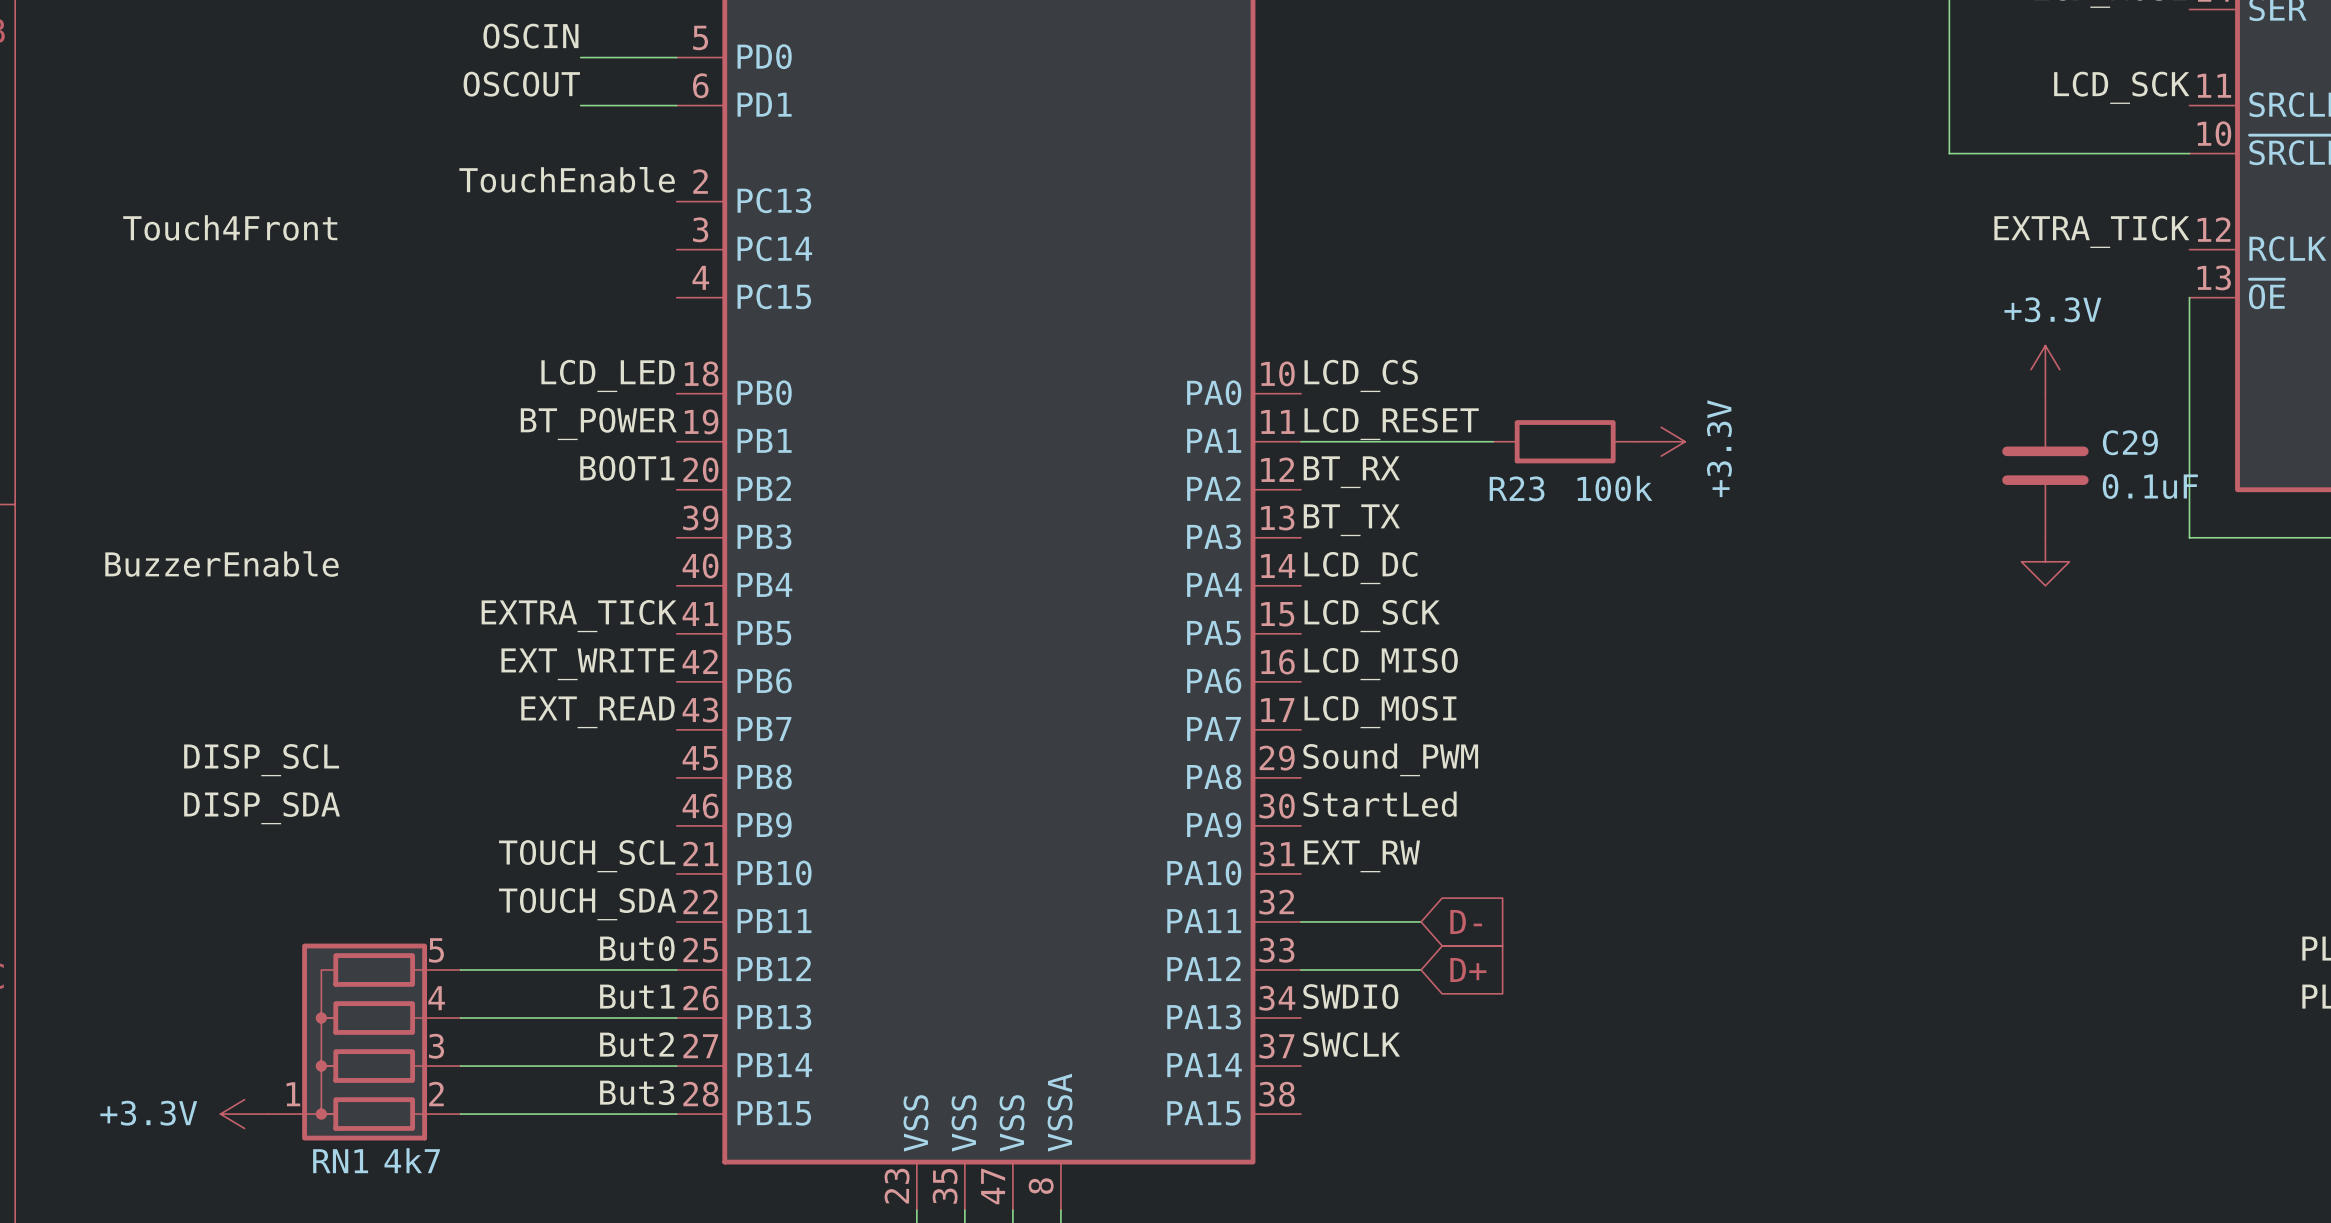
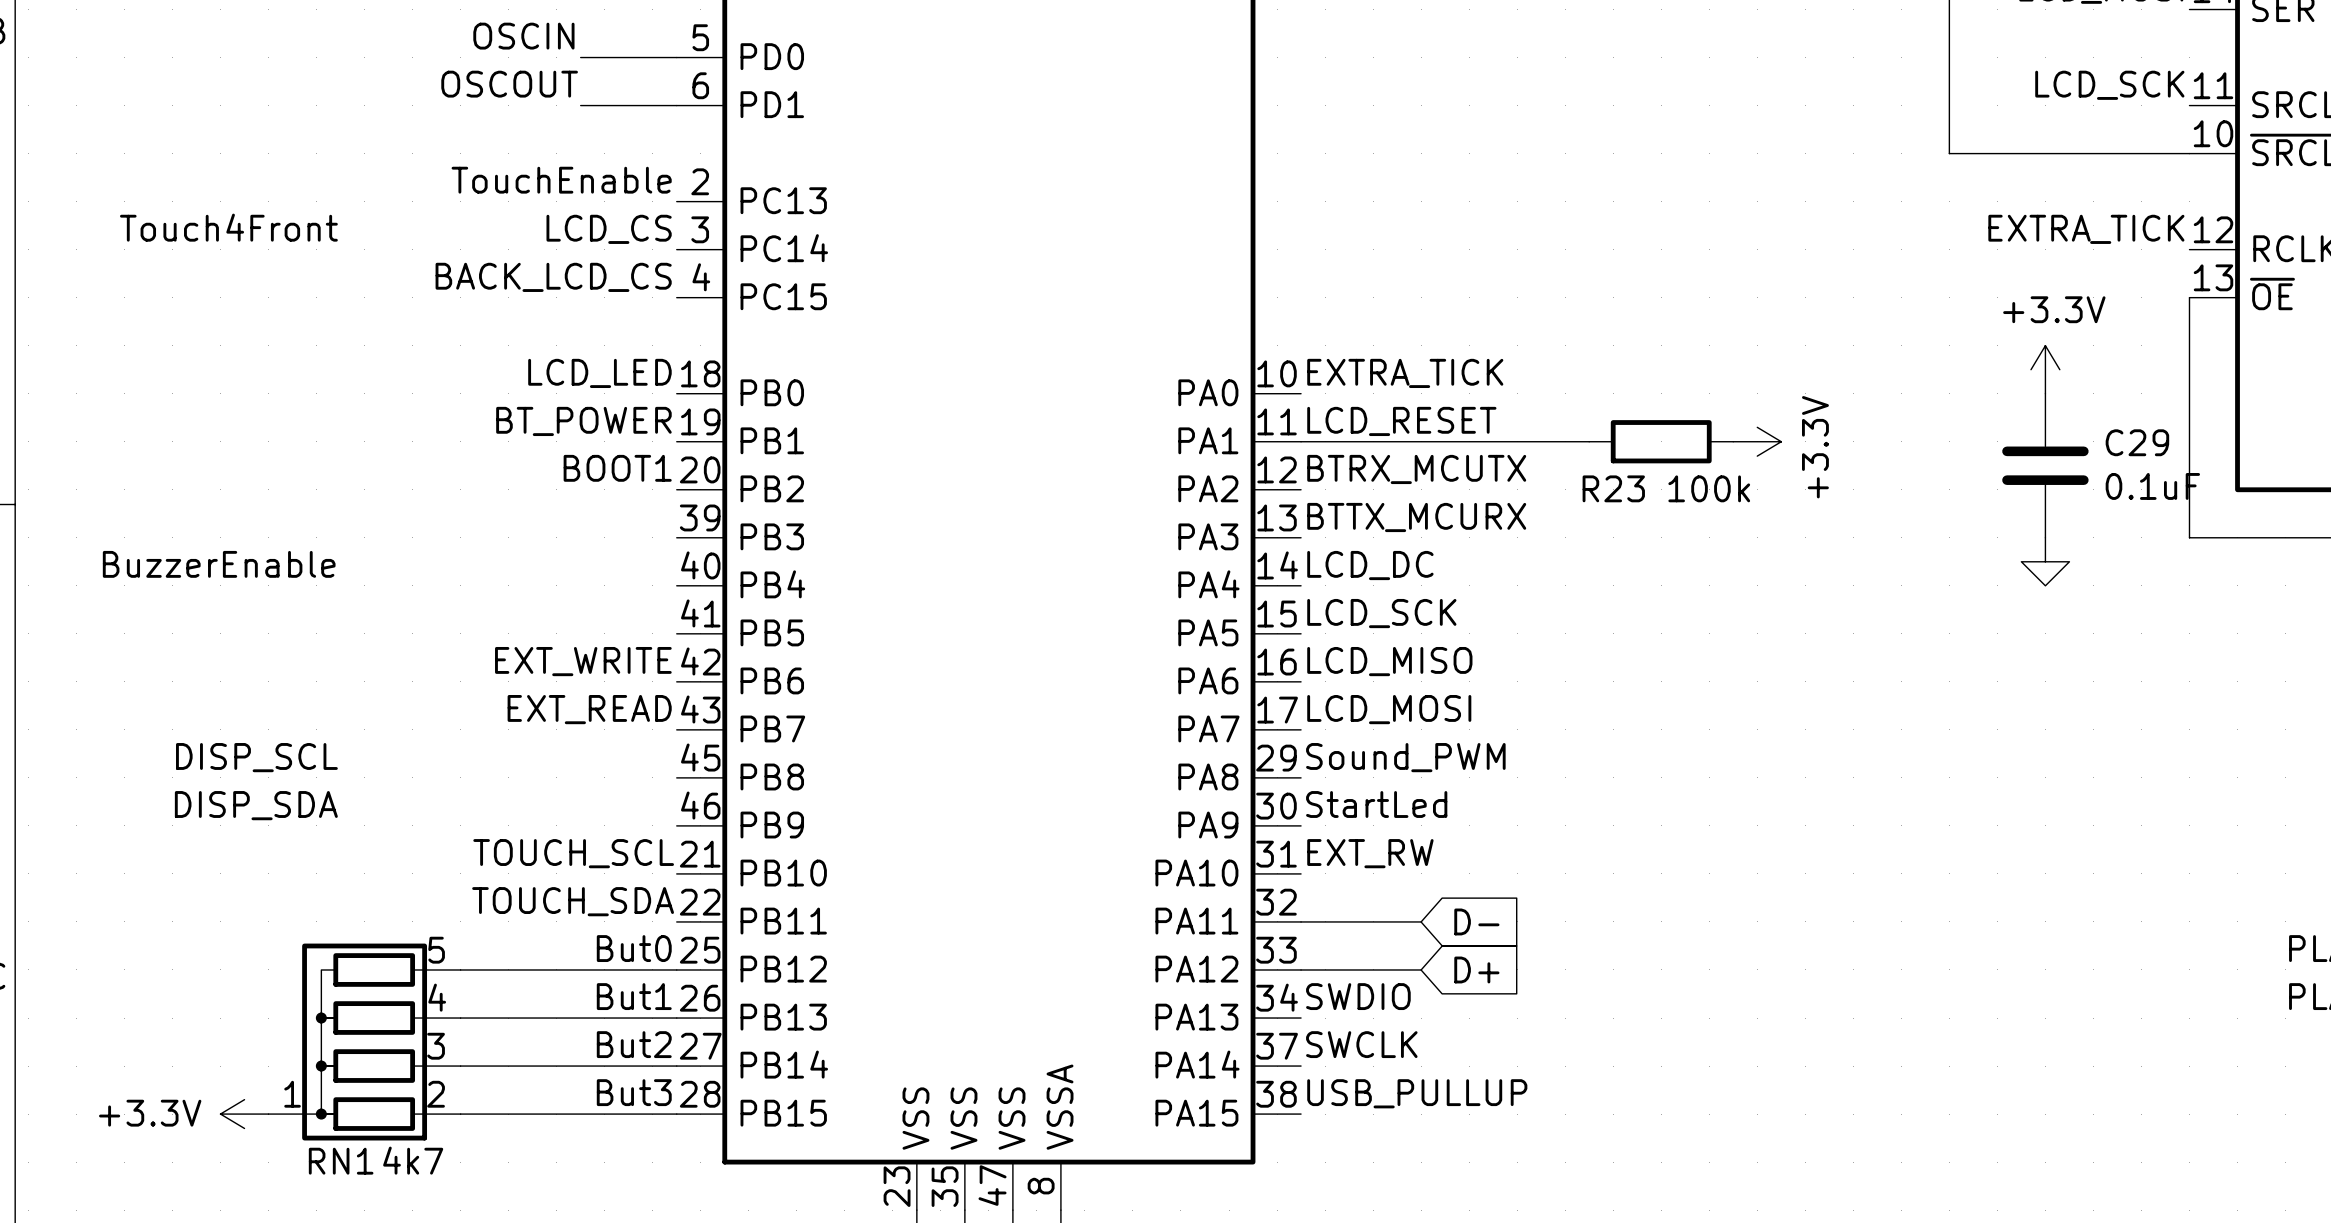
label: none -> LCD_CS (609, 229)
label: none -> BACK_LCD_CS (553, 277)
label: LCD_CS (1361, 375) -> EXTRA_TICK (1405, 373)
wire: none -> (1493, 441) (1589, 441)
R23 position: (1565, 441) -> (1661, 441)
power symbol position: +3.3V (1661, 441) -> +3.3V (1757, 441)
label: BT_RX (1351, 472) -> BTRX_MCUTX (1416, 469)
label: BT_TX (1351, 520) -> BTTX_MCURX (1416, 517)
label: EXTRA_TICK (579, 616) -> none
label: none -> USB_PULLUP (1417, 1093)

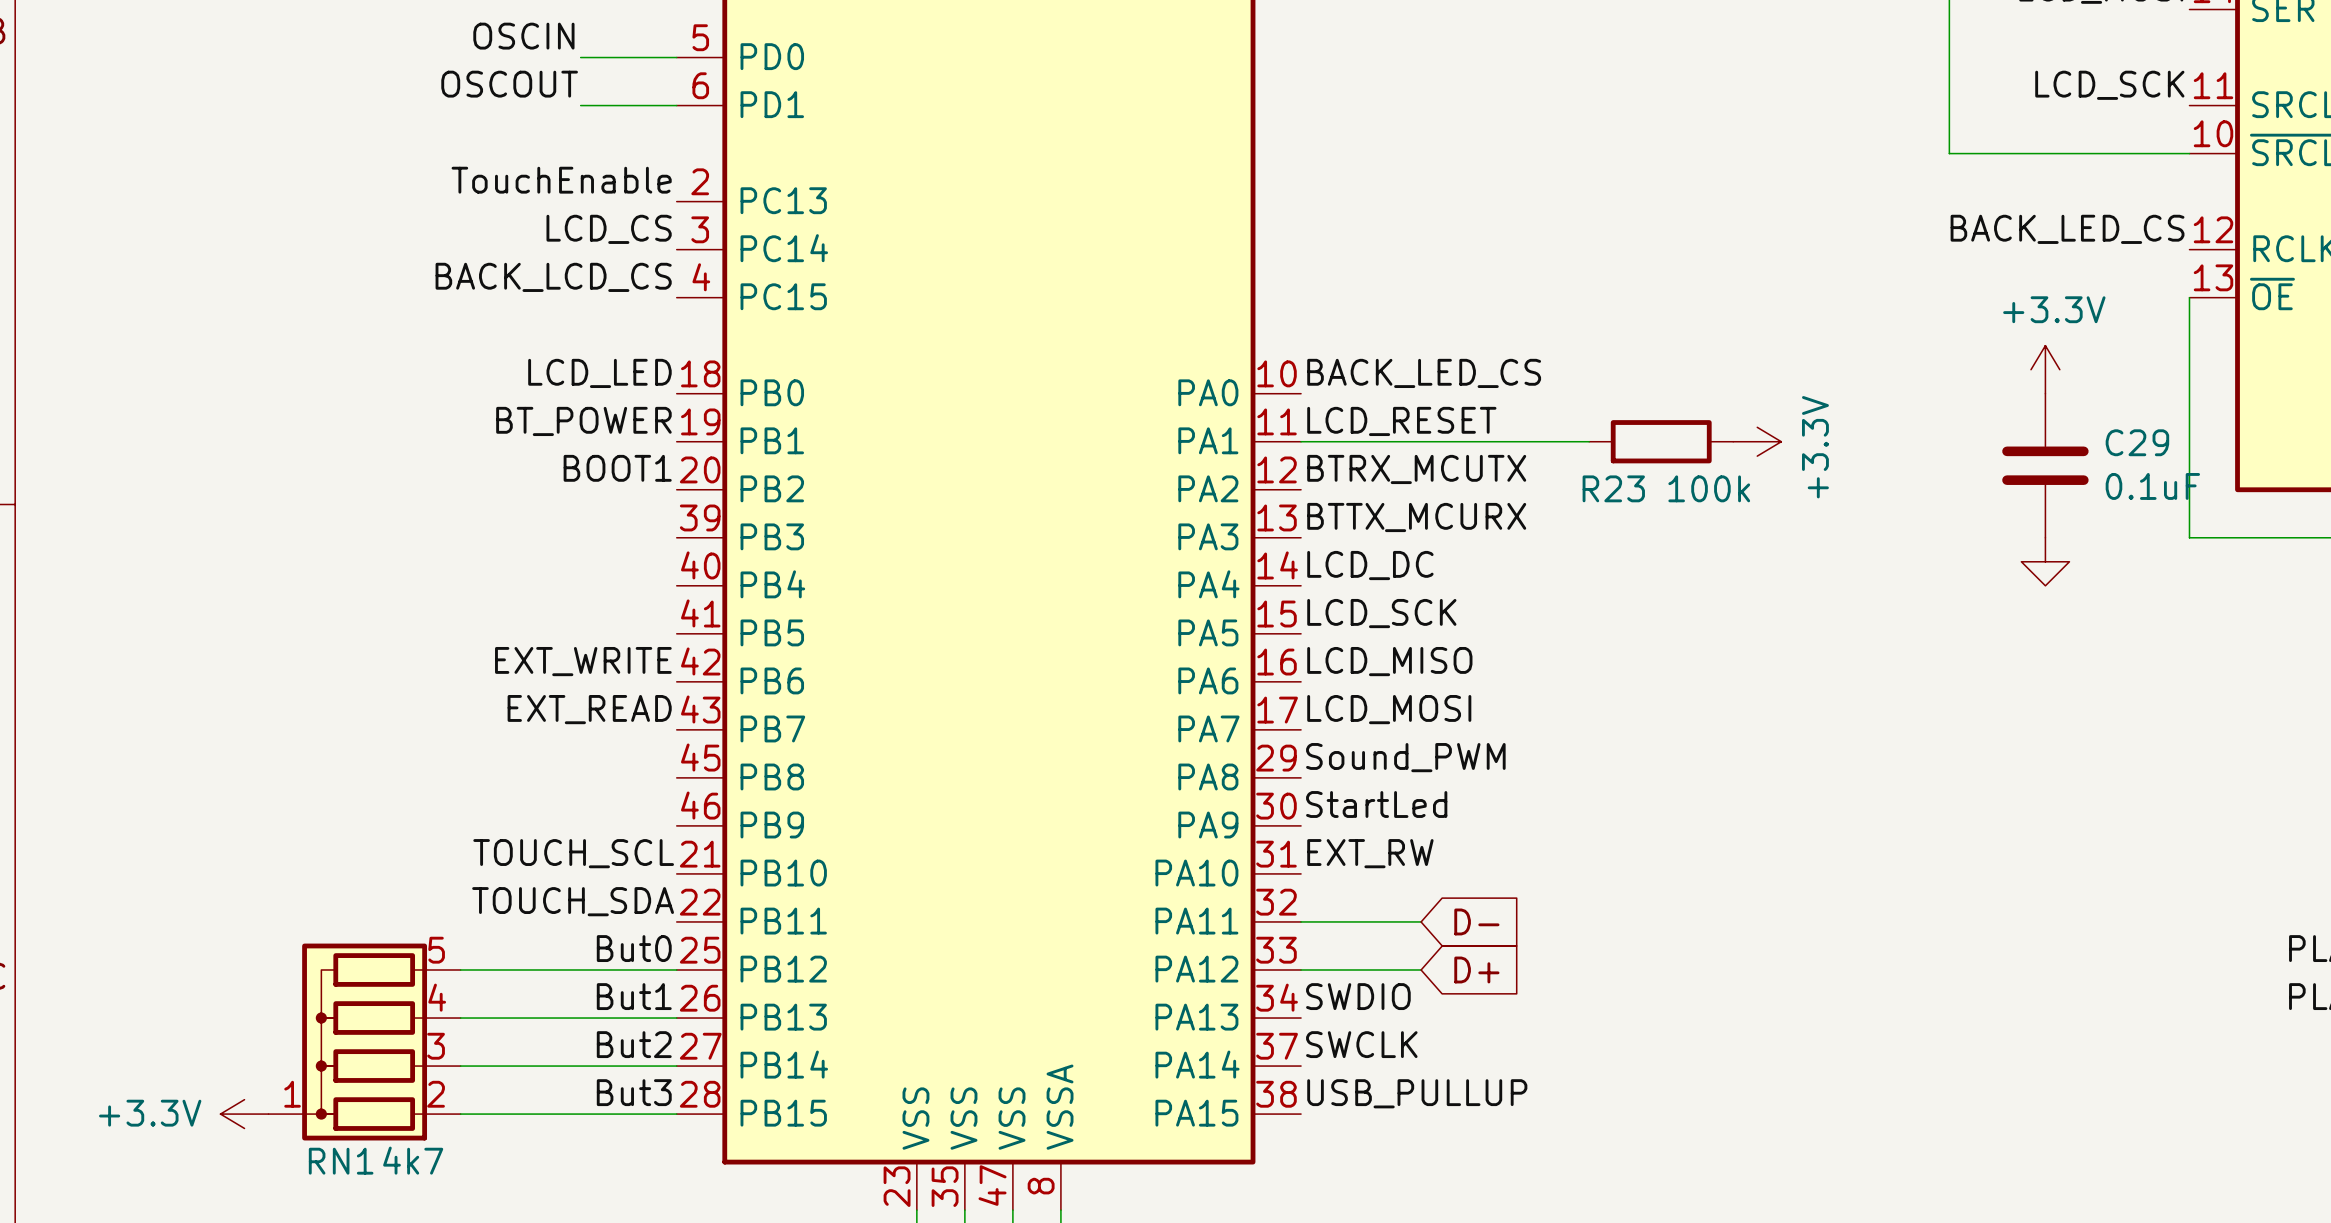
label: Touch4Front (228, 227) -> none
label: EXTRA_TICK (2086, 229) -> BACK_LED_CS (2067, 229)
label: EXTRA_TICK (1405, 373) -> BACK_LED_CS (1424, 373)
label: BuzzerEnable (219, 564) -> none
label: DISP_SCL (256, 757) -> none
label: DISP_SDA (256, 805) -> none

